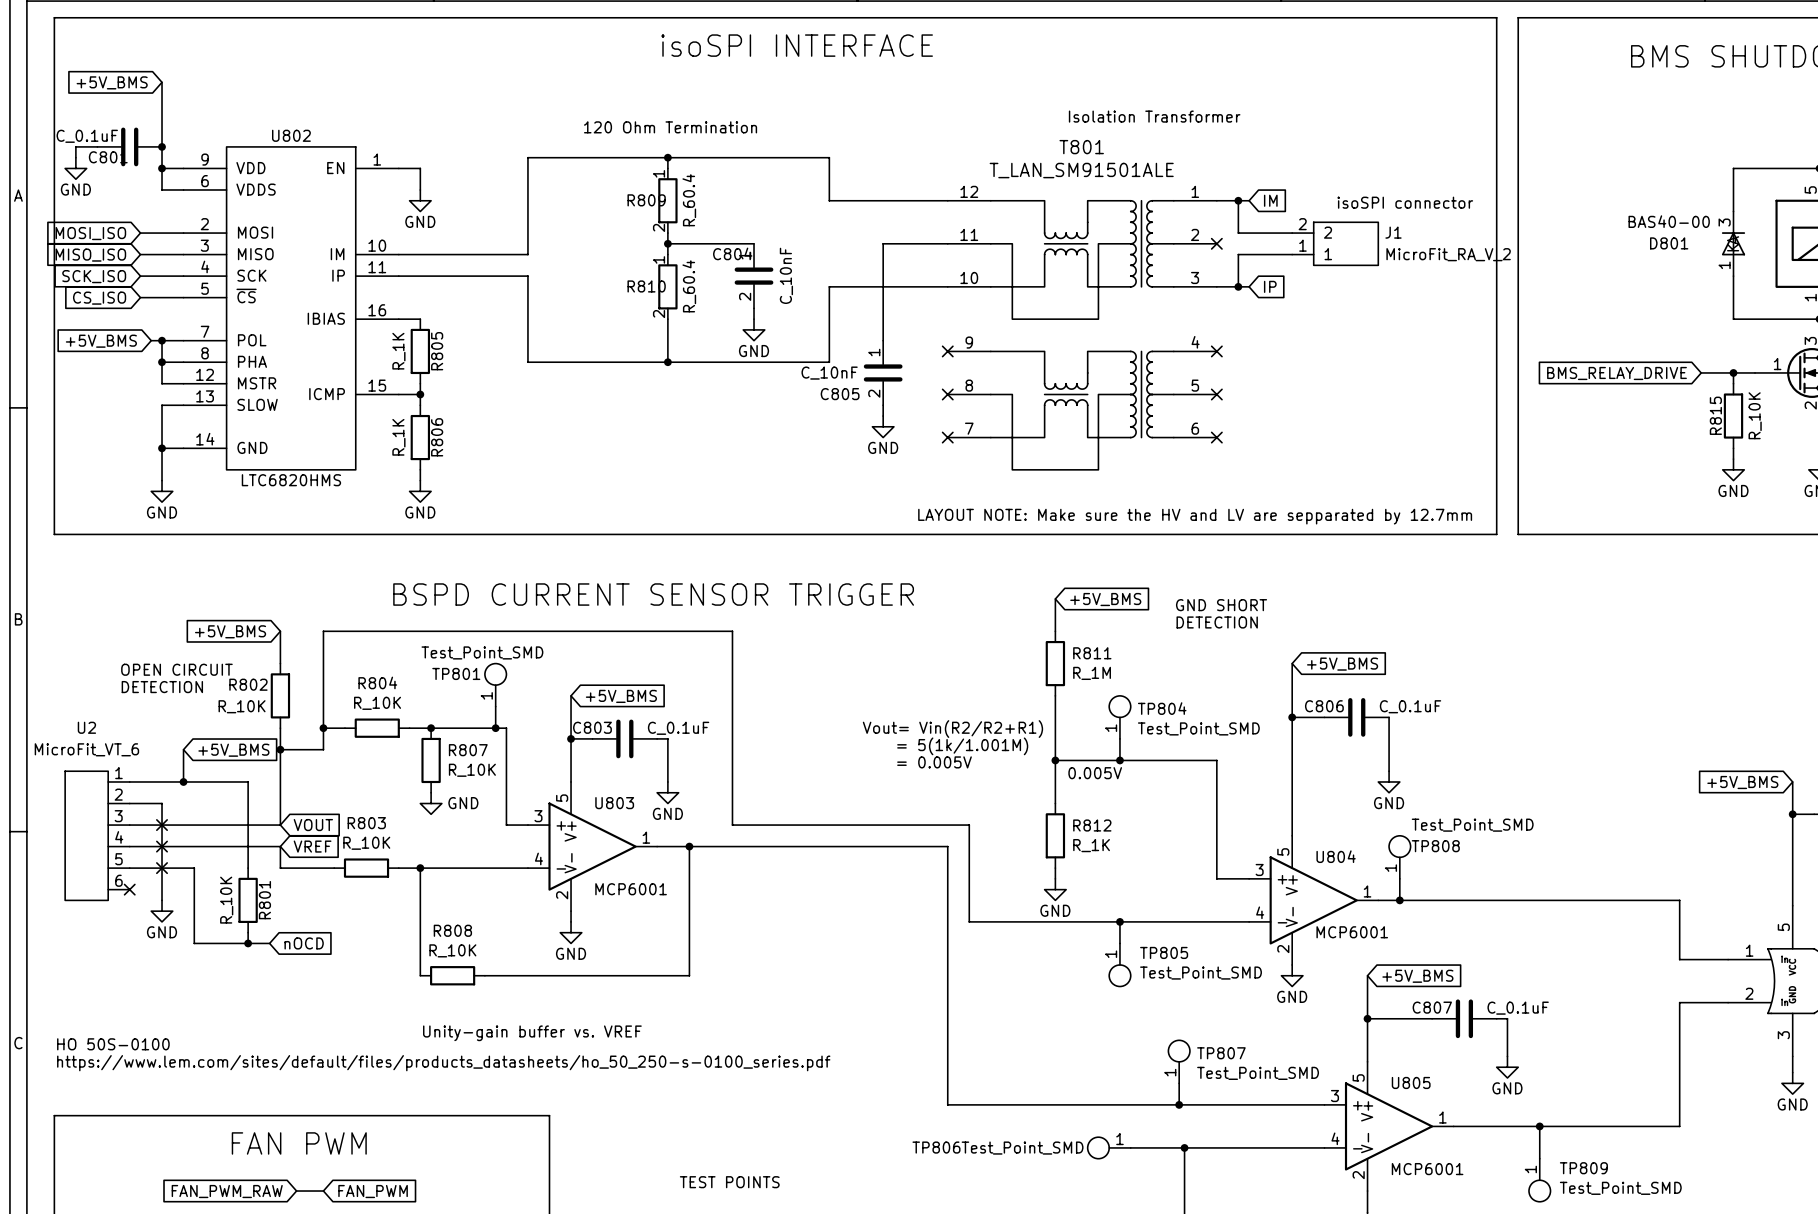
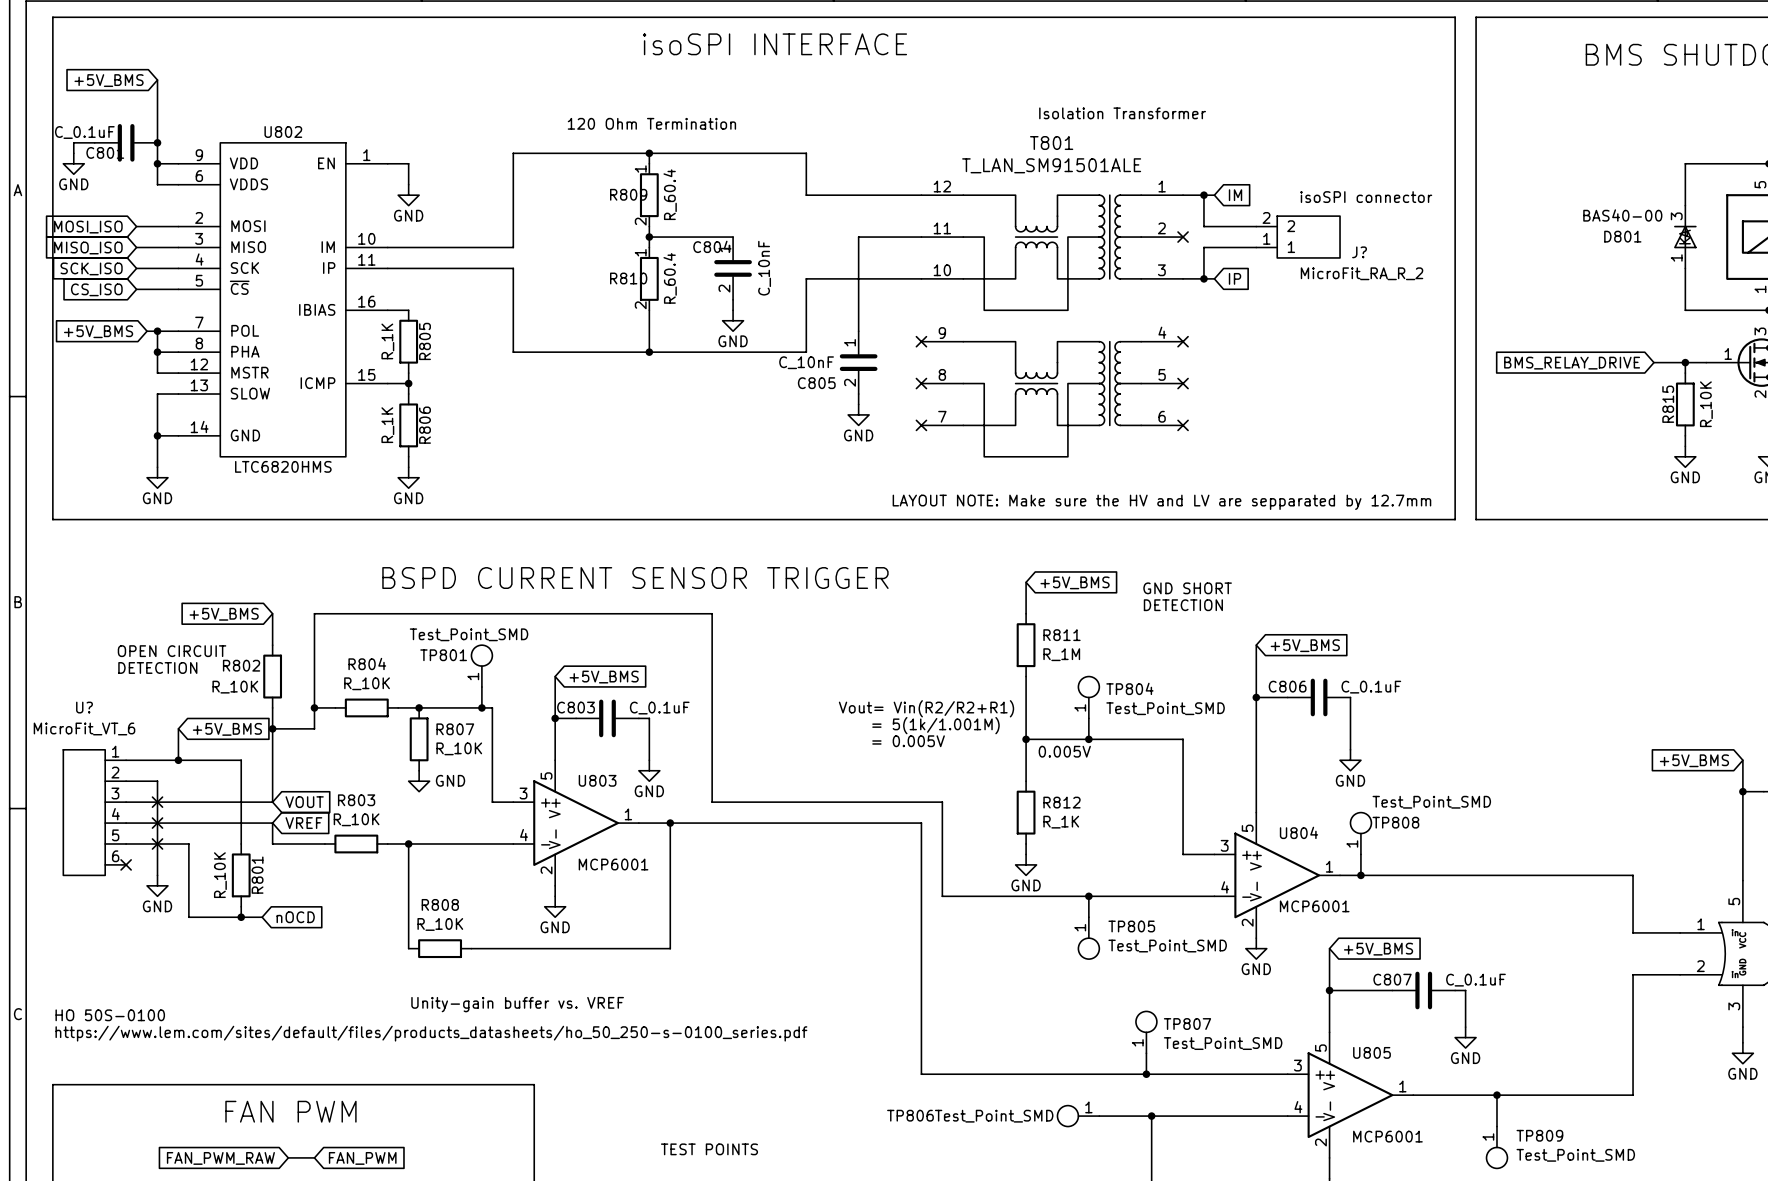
J1 name: J1 (1393, 232) -> J? (1359, 252)
J1 value: MicroFit_RA_V_2 (1448, 254) -> MicroFit_RA_R_2 (1362, 273)
U2 name: U2 (86, 727) -> U? (84, 707)

